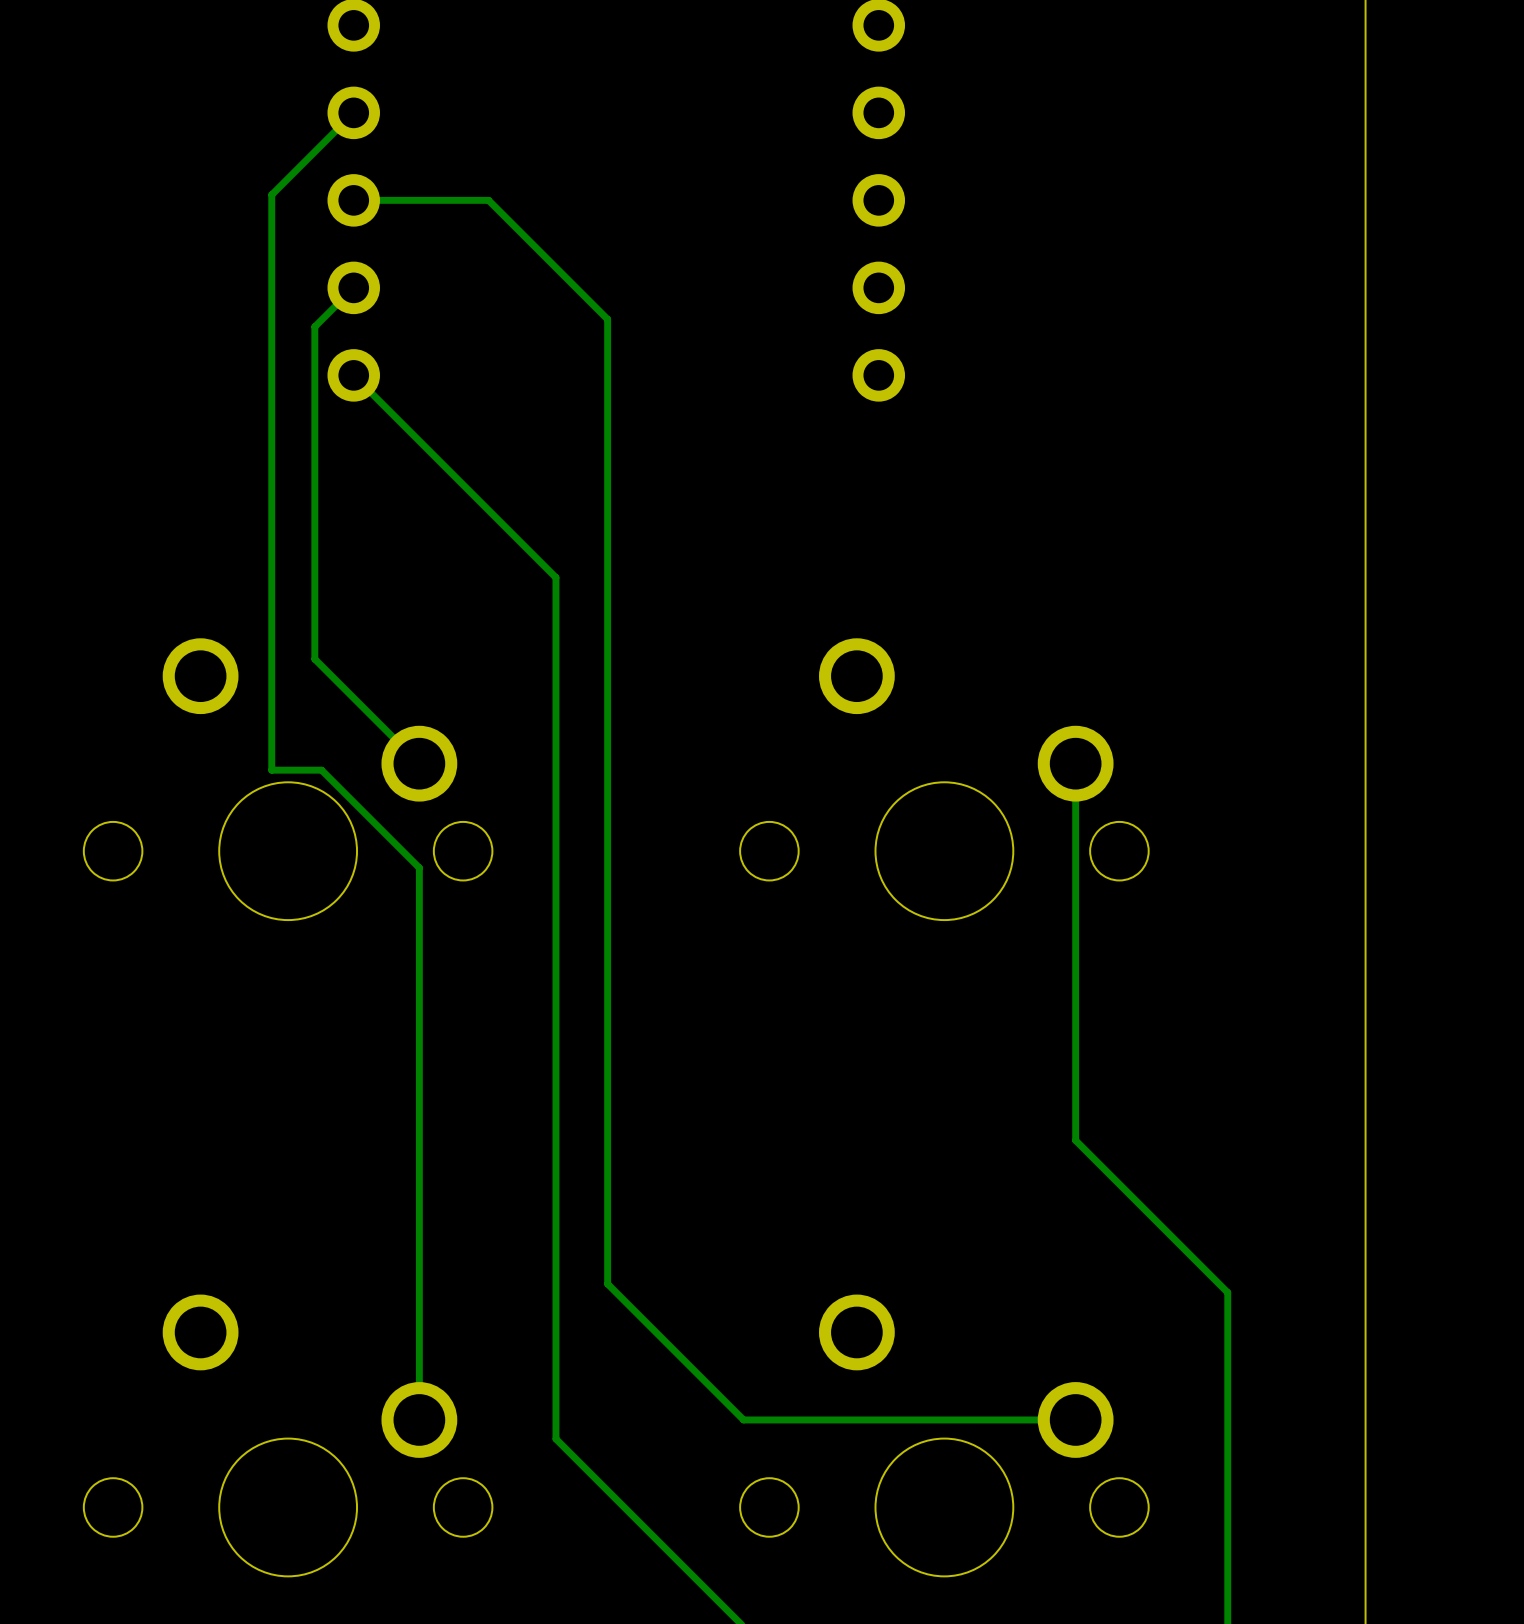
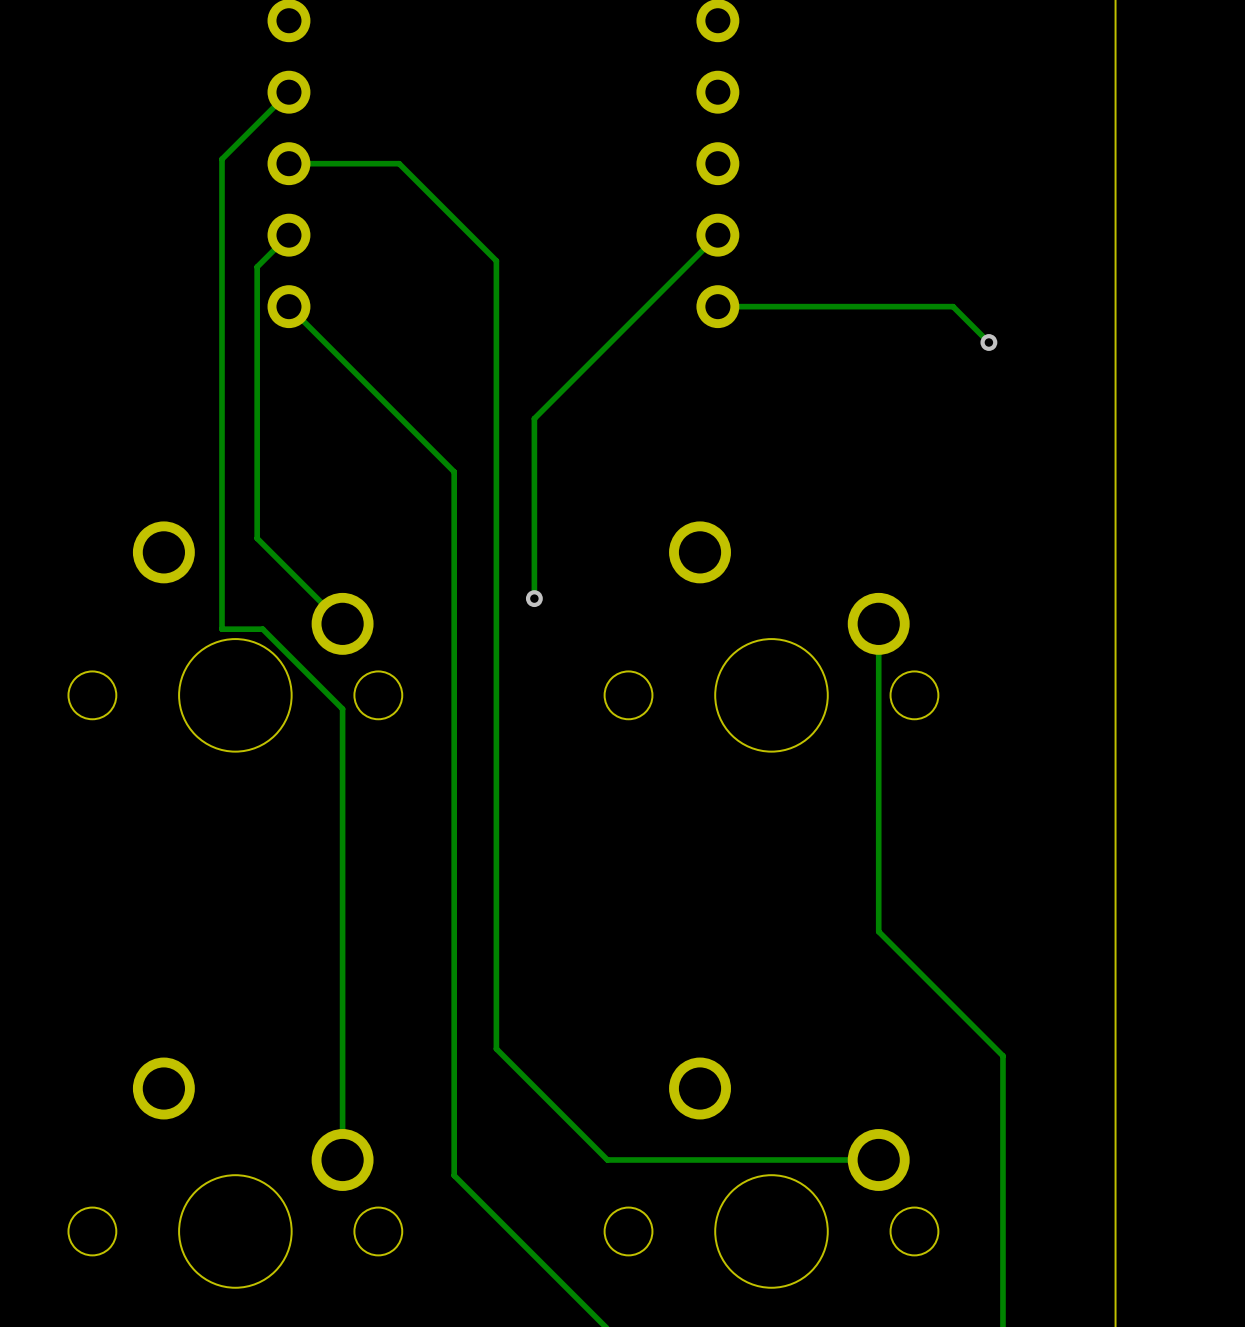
track: none -> (717, 235) (534, 418) (534, 598)
track: none -> (717, 306) (953, 306) (988, 342)
via: none -> (988, 342)
via: none -> (534, 598)

